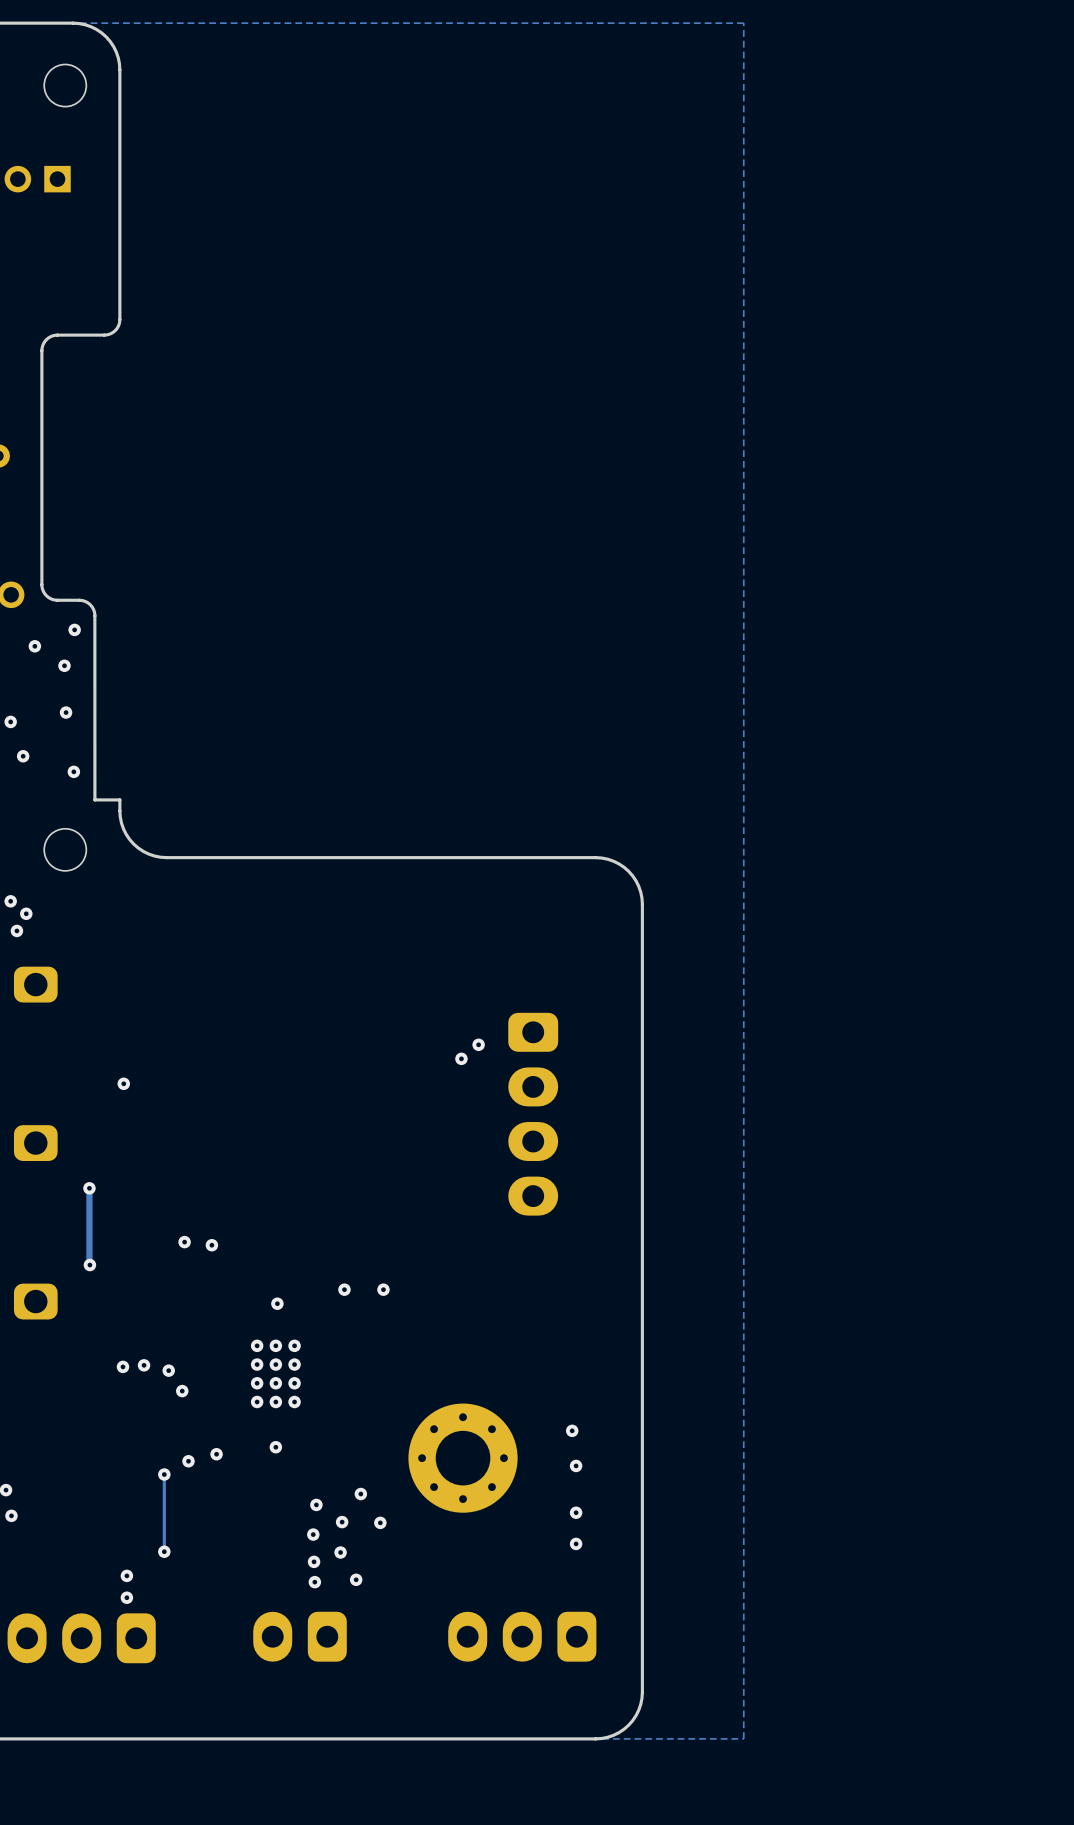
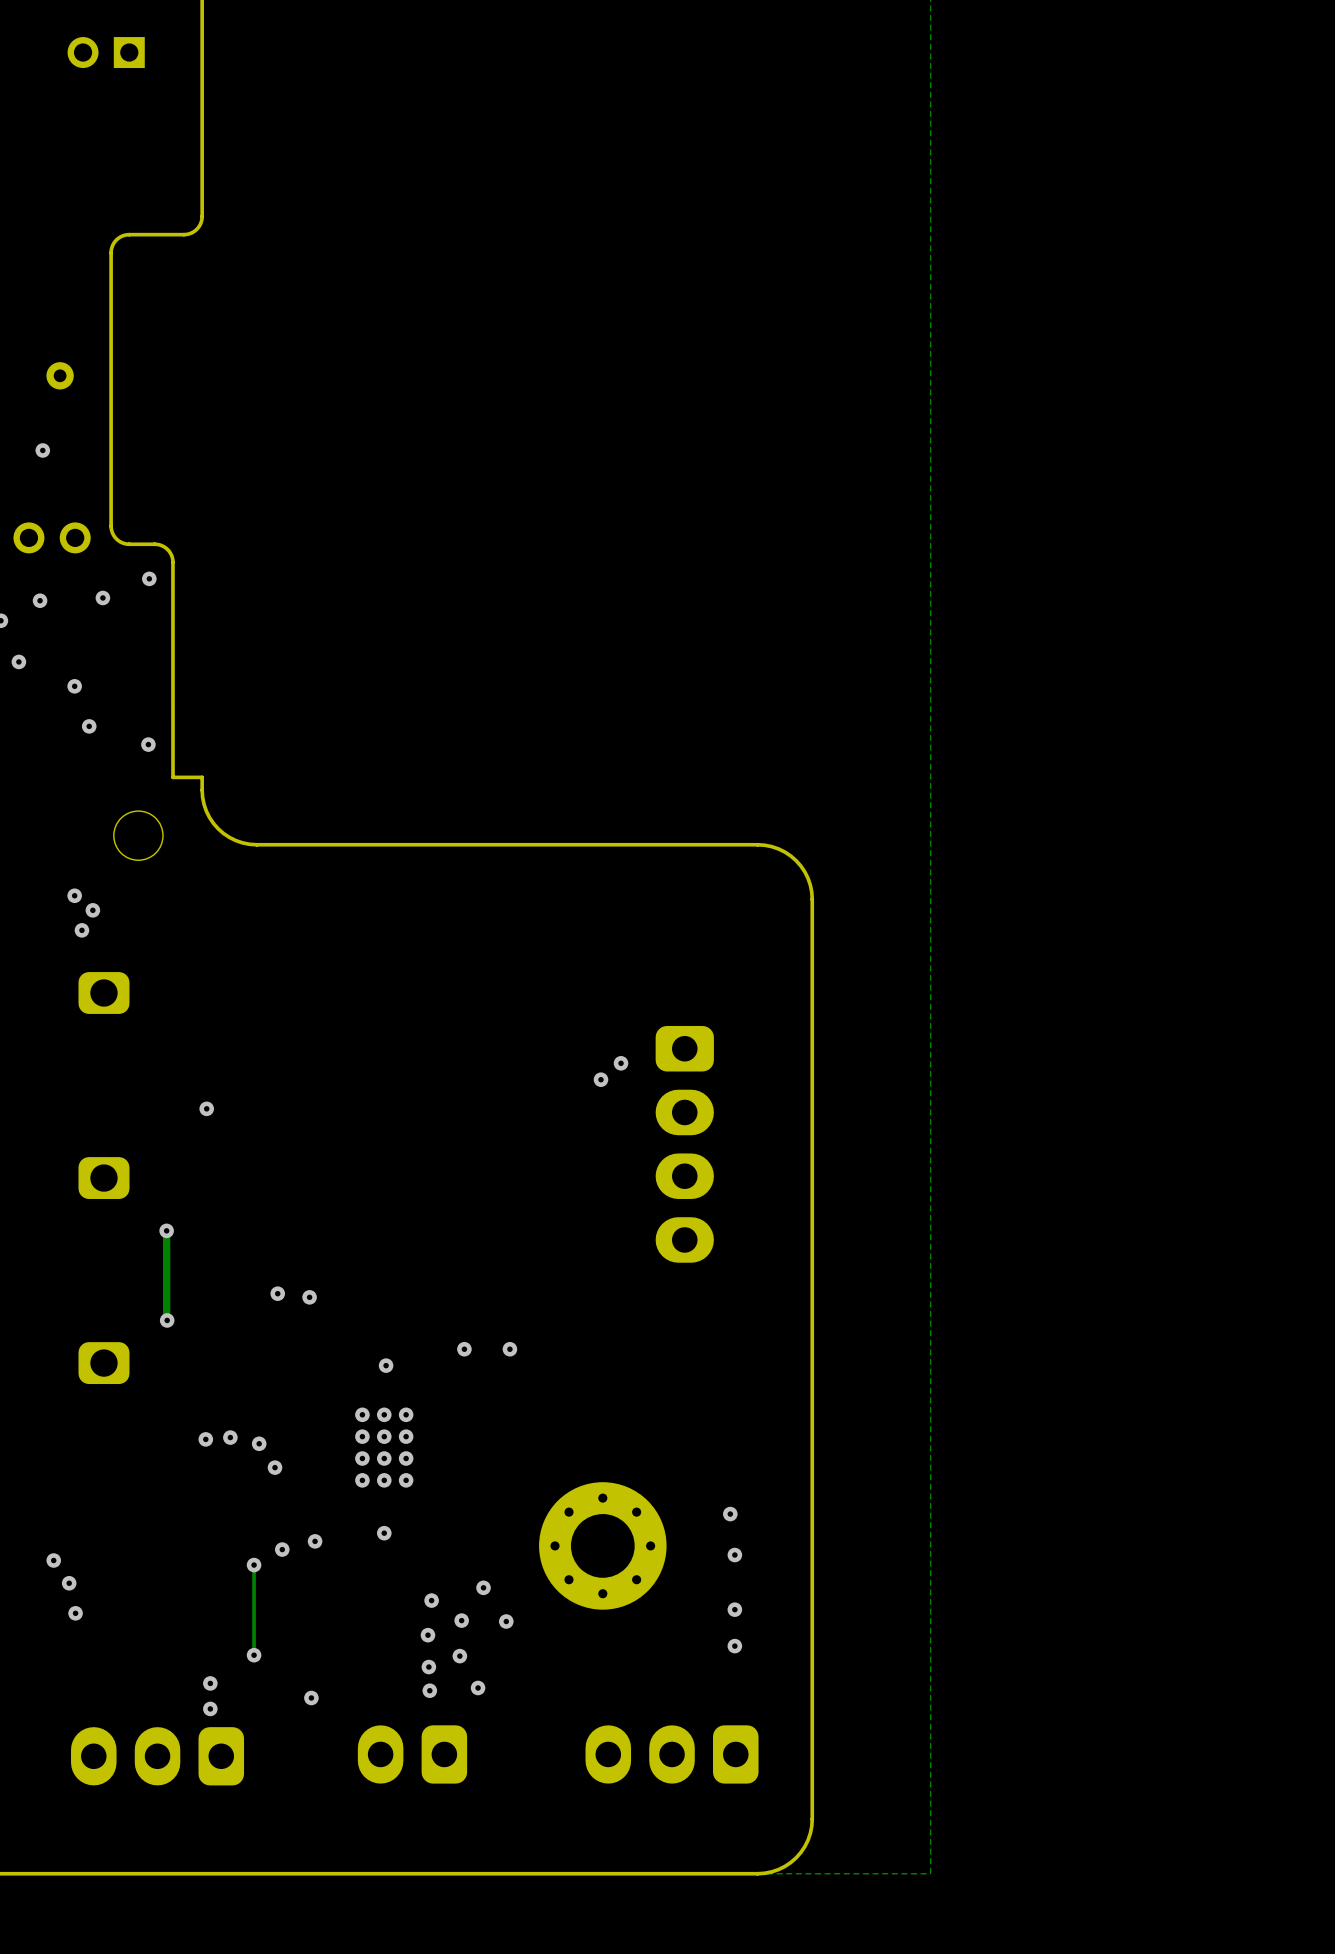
via: (64, 665) -> none
via: (66, 712) -> none
via: none -> (311, 1698)

